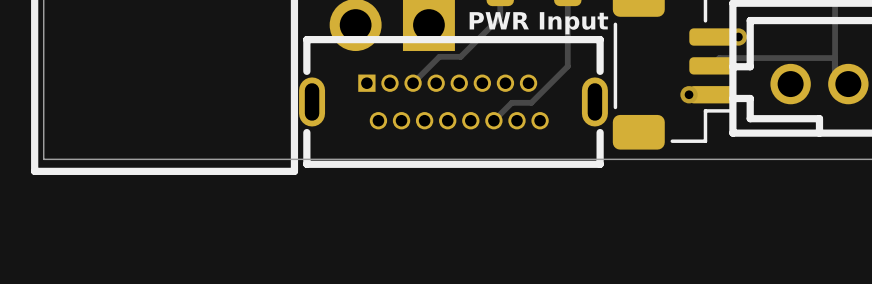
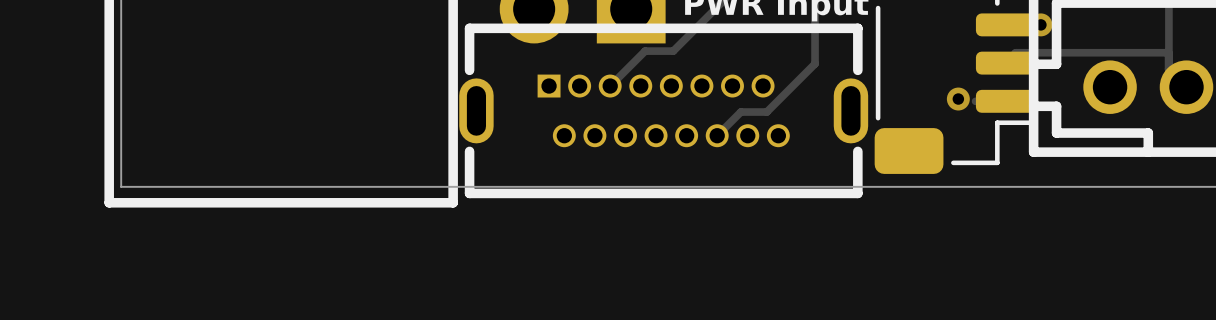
via position: (689, 94) -> (958, 99)

